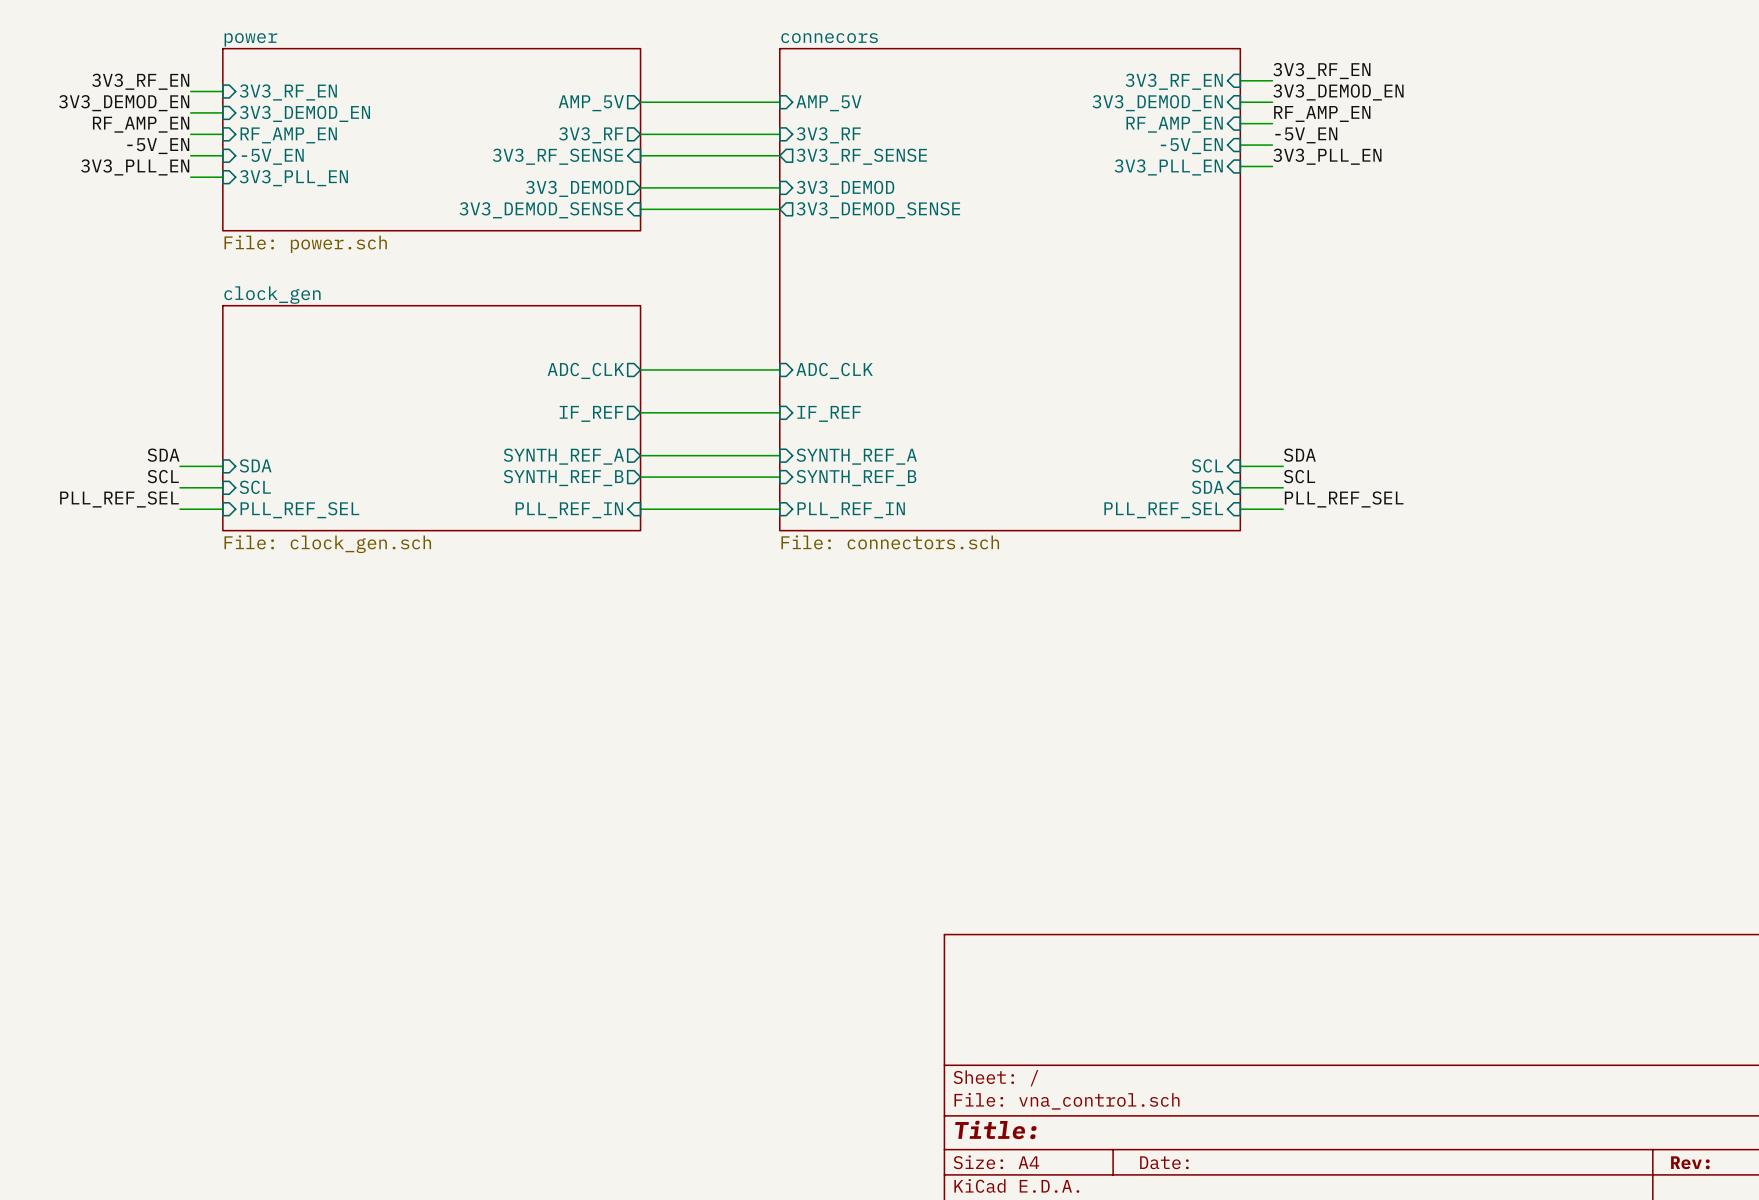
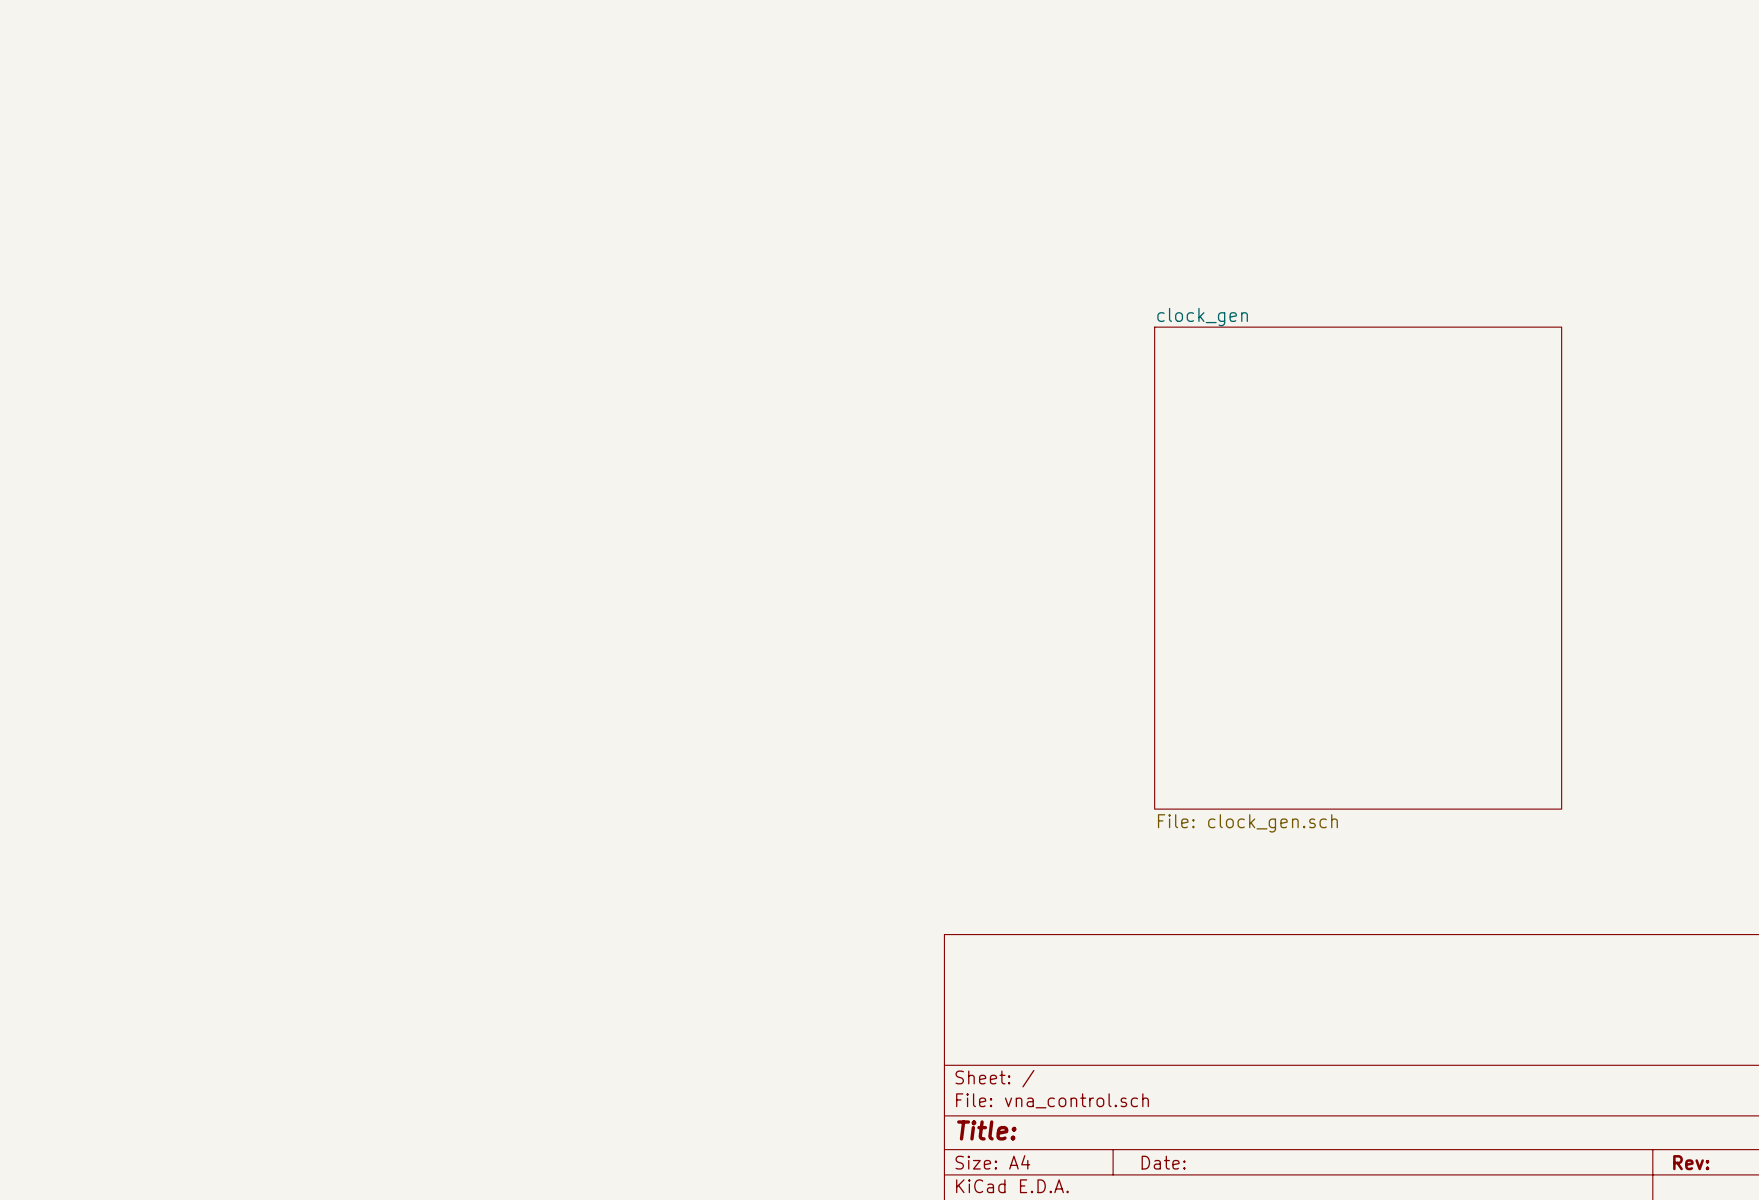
label: 3V3_RF_EN (1321, 71) -> none
wire: (1240, 80) (1272, 80) -> none
label: 3V3_RF_EN (140, 81) -> none
sheet pin: 3V3_RF_EN (1174, 81) -> none
wire: (190, 91) (222, 91) -> none
sheet pin: 3V3_RF_EN (288, 92) -> none
label: 3V3_DEMOD_EN (1338, 92) -> none
wire: (640, 102) (779, 102) -> none
wire: (1240, 102) (1272, 102) -> none
label: 3V3_DEMOD_EN (124, 103) -> none
sheet pin: AMP_5V (591, 103) -> none
sheet pin: AMP_5V (828, 103) -> none
sheet pin: 3V3_DEMOD_EN (1157, 103) -> none
wire: (190, 112) (222, 112) -> none
sheet pin: 3V3_DEMOD_EN (304, 113) -> none
label: RF_AMP_EN (1322, 113) -> none
wire: (1240, 123) (1272, 123) -> none
label: RF_AMP_EN (141, 124) -> none
sheet pin: RF_AMP_EN (1174, 124) -> none
wire: (190, 134) (222, 134) -> none
wire: (640, 134) (779, 134) -> none
sheet pin: RF_AMP_EN (288, 135) -> none
sheet pin: 3V3_RF (591, 135) -> none
sheet pin: 3V3_RF (828, 135) -> none
label: -5V_EN (1306, 135) -> none
sheet power: File: power.sch (431, 139) -> none
wire: (1240, 145) (1272, 145) -> none
label: -5V_EN (158, 146) -> none
sheet pin: -5V_EN (1191, 146) -> none
wire: (190, 155) (222, 155) -> none
wire: (640, 155) (779, 155) -> none
sheet pin: -5V_EN (272, 156) -> none
sheet pin: 3V3_RF_SENSE (557, 156) -> none
sheet pin: 3V3_RF_SENSE (861, 156) -> none
label: 3V3_PLL_EN (1327, 156) -> none
wire: (1240, 166) (1272, 166) -> none
label: 3V3_PLL_EN (135, 167) -> none
sheet pin: 3V3_PLL_EN (1168, 167) -> none
wire: (190, 177) (222, 177) -> none
sheet pin: 3V3_PLL_EN (293, 178) -> none
wire: (640, 187) (779, 187) -> none
sheet pin: 3V3_DEMOD (574, 188) -> none
sheet pin: 3V3_DEMOD (845, 188) -> none
wire: (640, 209) (779, 209) -> none
sheet pin: 3V3_DEMOD_SENSE (541, 210) -> none
sheet pin: 3V3_DEMOD_SENSE (878, 210) -> none
sheet connecors: File: connectors.sch (1010, 289) -> none
wire: (640, 369) (779, 369) -> none
sheet pin: ADC_CLK (585, 370) -> none
sheet pin: ADC_CLK (834, 370) -> none
wire: (640, 412) (779, 412) -> none
sheet pin: IF_REF (591, 413) -> none
sheet pin: IF_REF (829, 413) -> none
sheet clock_gen: File: clock_gen.sch (431, 418) -> none
label: SDA (163, 455) -> none
wire: (640, 455) (779, 455) -> none
label: SDA (1299, 455) -> none
sheet pin: SYNTH_REF_A (563, 456) -> none
sheet pin: SYNTH_REF_A (856, 456) -> none
sheet pin: SDA (255, 465) -> none
sheet pin: SCL (1207, 465) -> none
wire: (180, 466) (222, 466) -> none
wire: (1240, 466) (1283, 466) -> none
label: SCL (163, 476) -> none
label: SCL (1299, 476) -> none
wire: (640, 477) (779, 477) -> none
sheet pin: SYNTH_REF_B (563, 478) -> none
sheet pin: SYNTH_REF_B (856, 478) -> none
wire: (180, 487) (222, 487) -> none
sheet pin: SCL (255, 487) -> none
sheet pin: SDA (1207, 487) -> none
wire: (1240, 487) (1283, 487) -> none
label: PLL_REF_SEL (119, 499) -> none
label: PLL_REF_SEL (1344, 499) -> none
wire: (180, 509) (222, 509) -> none
wire: (640, 509) (779, 509) -> none
wire: (1240, 509) (1283, 509) -> none
sheet pin: PLL_REF_SEL (299, 510) -> none
sheet pin: PLL_REF_IN (569, 510) -> none
sheet pin: PLL_REF_IN (851, 510) -> none
sheet pin: PLL_REF_SEL (1163, 510) -> none
sheet clock_gen: none -> File: clock_gen.sch (1358, 568)

